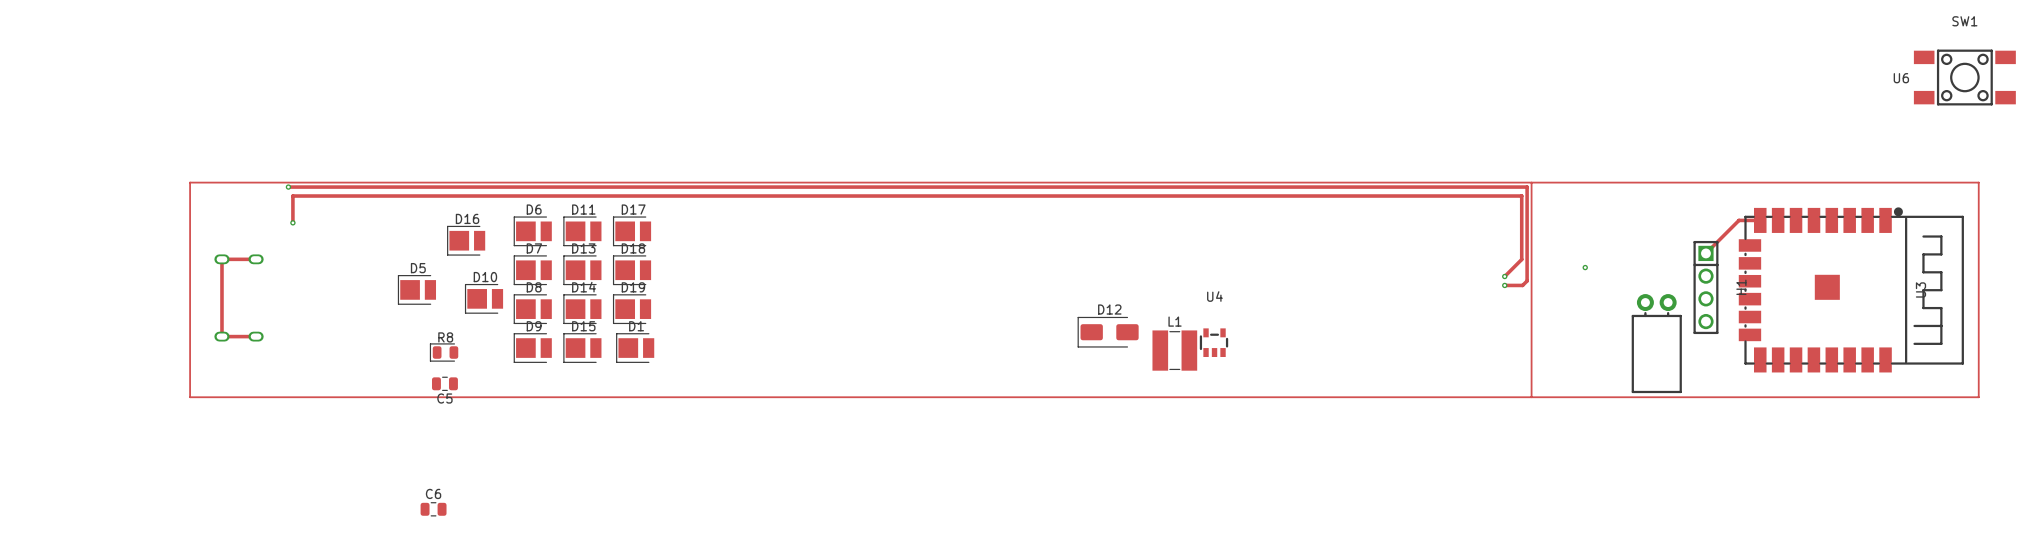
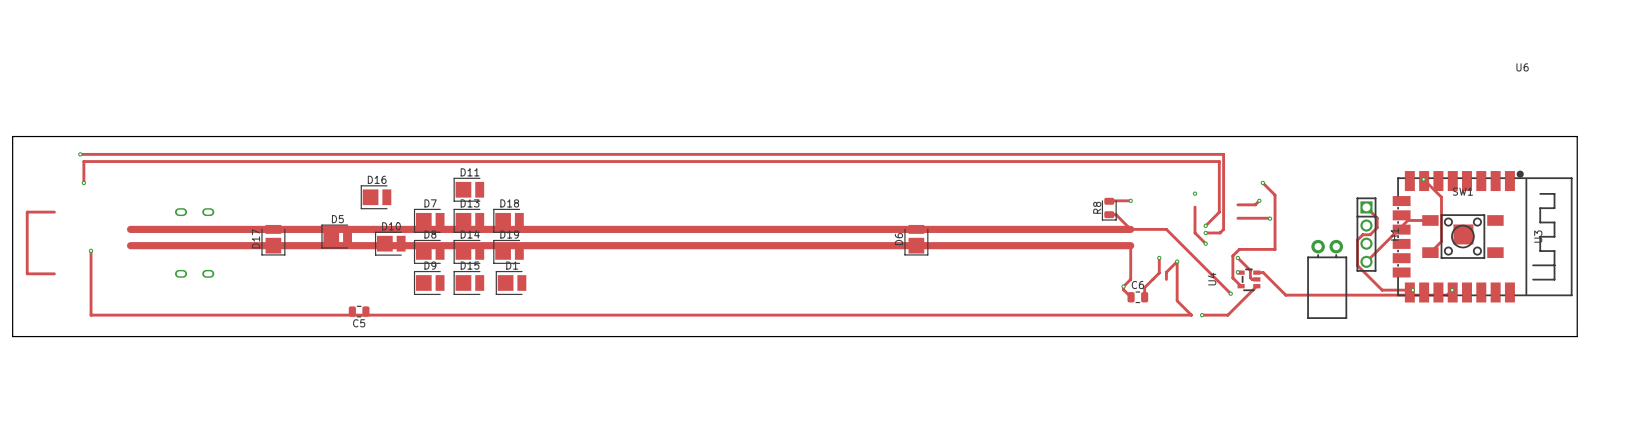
SW1 position: (1964, 77) -> (1462, 236)
board edge: none -> (12, 136) (1577, 136) (1577, 336) (12, 336) (12, 136)
track: (190, 182) (1978, 182) (1978, 397) (190, 397) (190, 182) -> none
track: (1531, 182) (1531, 397) -> none
track: none -> (80, 154) (234, 154)
via: none -> (80, 154)
via: (288, 187) -> none
track: (292, 196) (292, 222) -> (237, 161) (83, 161) (83, 182)
track: none -> (1423, 179) (1441, 197) (1441, 241) (1430, 252)
via: none -> (1423, 179)
track: (1760, 220) (1738, 220) (1705, 253) -> (1412, 290) (1382, 290) (1357, 265) (1357, 239) (1362, 234) (1370, 234) (1377, 227) (1377, 218) (1366, 207)
via: none -> (83, 182)
via: (292, 222) -> none
track: none -> (1262, 182) (1275, 195) (1275, 249) (1239, 249) (1232, 255) (1232, 277) (1241, 286)
via: none -> (1262, 182)
D6 rotation: 0° (532, 231) -> 90° counterclockwise (916, 240)
D6 position: (532, 231) -> (916, 240)
D17 rotation: 0° (632, 231) -> 90° counterclockwise (273, 240)
D17 position: (632, 231) -> (273, 240)
via: none -> (1195, 193)
track: none -> (1130, 200) (1109, 201)
via: none -> (1130, 200)
track: none -> (1259, 200) (1255, 204) (1237, 204)
via: none -> (1259, 200)
track: none -> (1195, 207) (1195, 232) (1205, 243)
track: (256, 259) (221, 259) (221, 336) (256, 336) -> (54, 212) (27, 212) (27, 273) (54, 273)
track: none -> (1109, 214) (1115, 214) (1130, 229)
track: none -> (1237, 218) (1270, 218)
track: none -> (1430, 220) (1407, 220) (1366, 261)
track: none -> (130, 229) (1130, 229)
track: none -> (1130, 229) (1166, 229) (1230, 293)
via: none -> (1205, 243)
track: none -> (130, 245) (1130, 245) (1130, 279) (1123, 286) (1123, 289) (1131, 297)
track: none -> (91, 250) (91, 315) (1191, 315) (1177, 300) (1177, 261) (1166, 272) (1166, 279)
via: none -> (91, 250)
track: none -> (1159, 257) (1159, 272) (1144, 287) (1144, 297)
via: none -> (1159, 257)
track: none -> (1237, 257) (1250, 270) (1250, 277) (1256, 279)
via: none -> (1237, 257)
via: none -> (1177, 261)
D12: (1108, 332) -> none
via: none -> (1237, 272)
track: none -> (1256, 272) (1263, 272) (1285, 295) (1447, 295) (1452, 290)
U4 rotation: 0° (1213, 342) -> 90° counterclockwise (1248, 279)
U4 position: (1213, 342) -> (1248, 279)
L1: (1174, 350) -> none
R8 rotation: 0° (444, 352) -> 90° counterclockwise (1109, 209)
R8 position: (444, 352) -> (1109, 209)
via: none -> (1123, 286)
track: none -> (1256, 286) (1227, 315) (1202, 315)
via: none -> (1412, 290)
via: none -> (1452, 290)
via: none -> (1230, 293)
via: none -> (1202, 315)
C6 position: (433, 509) -> (1137, 297)

